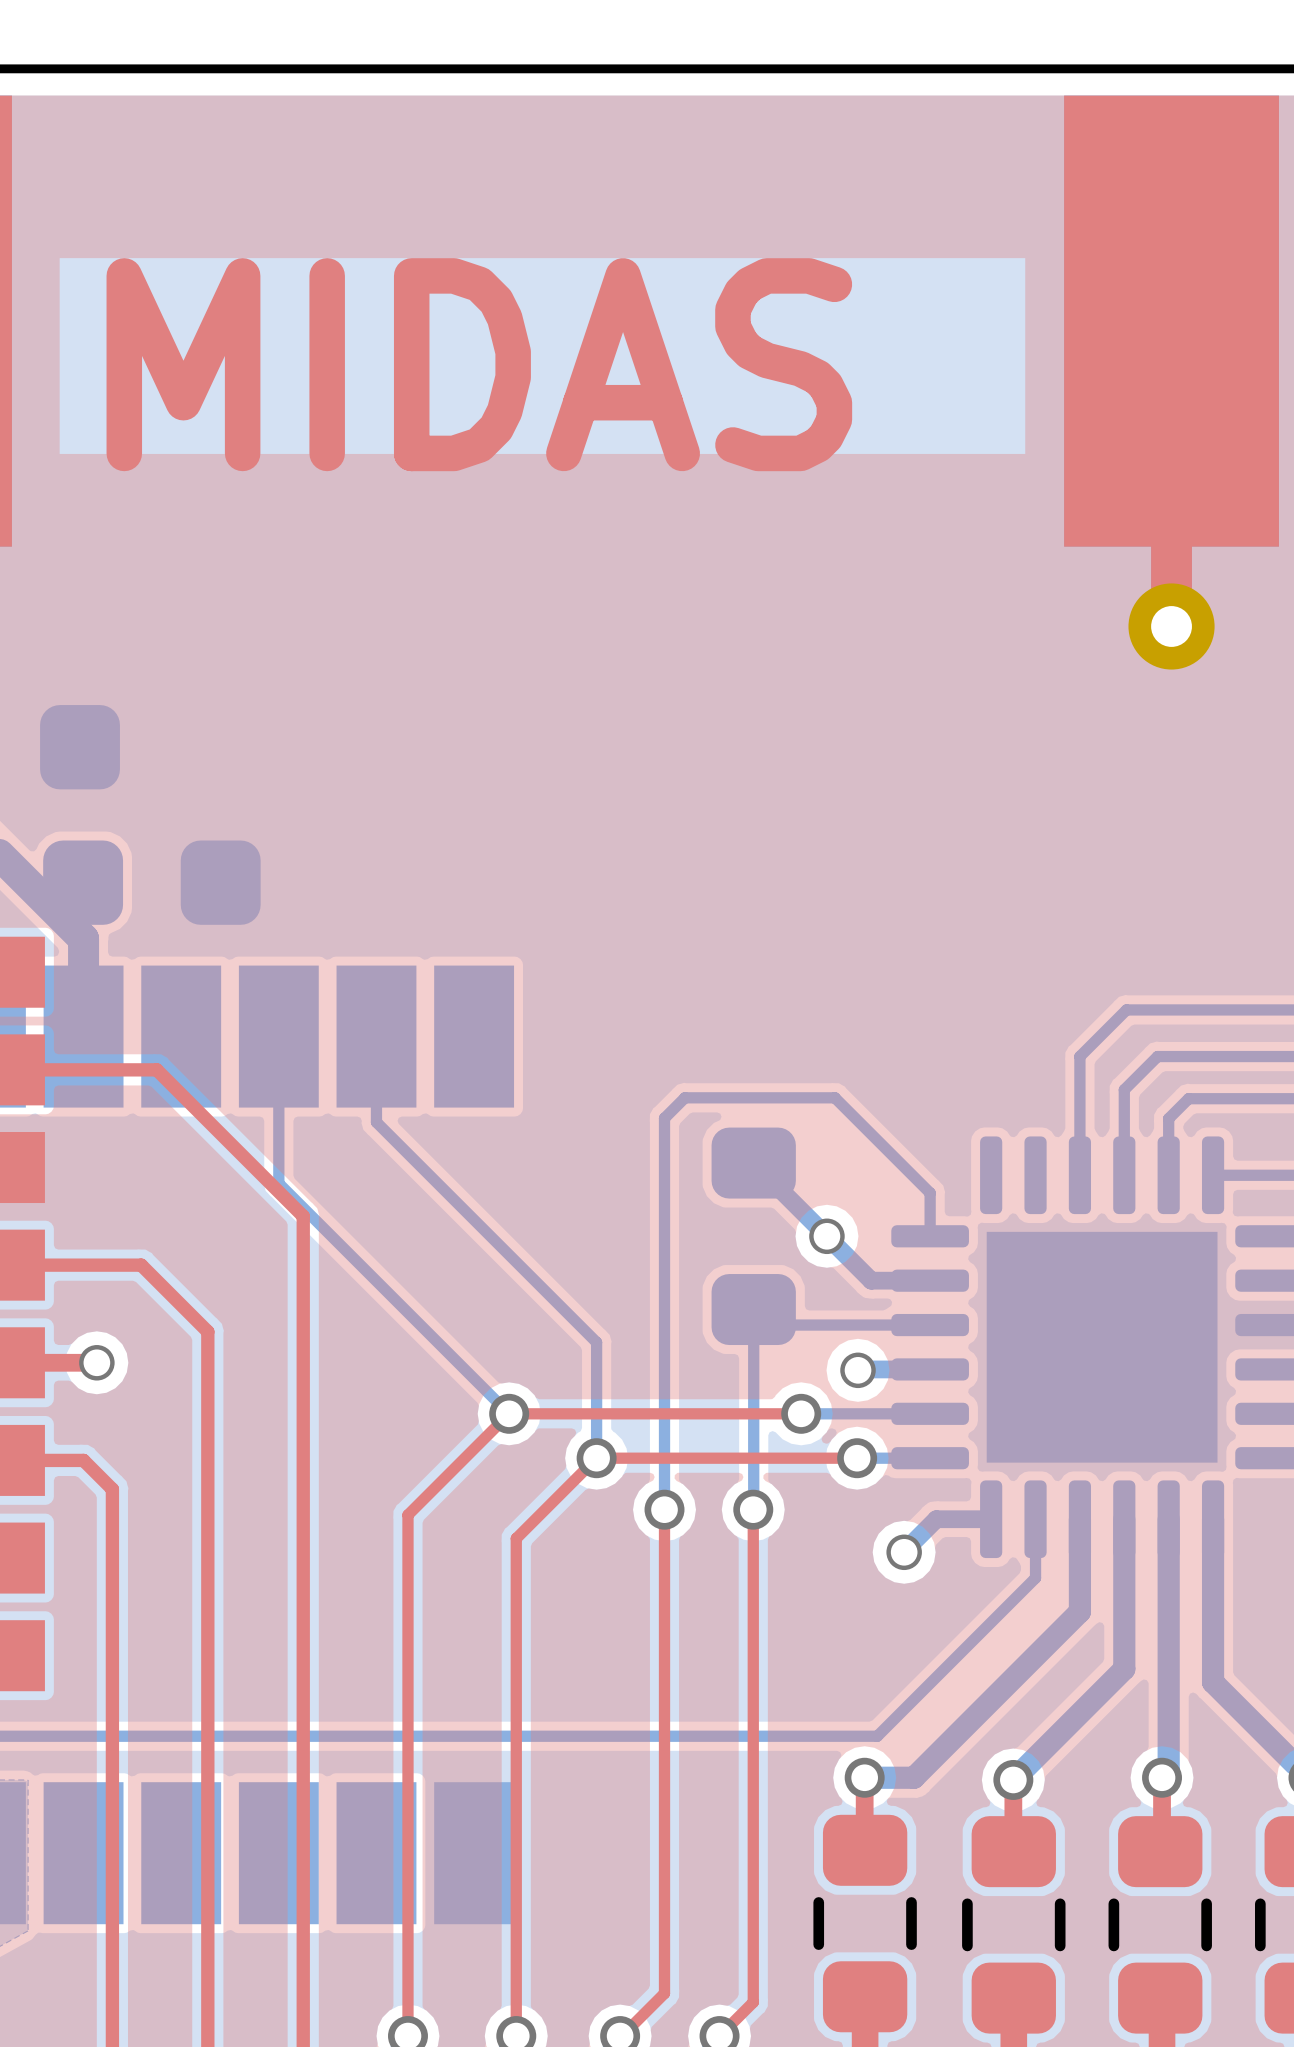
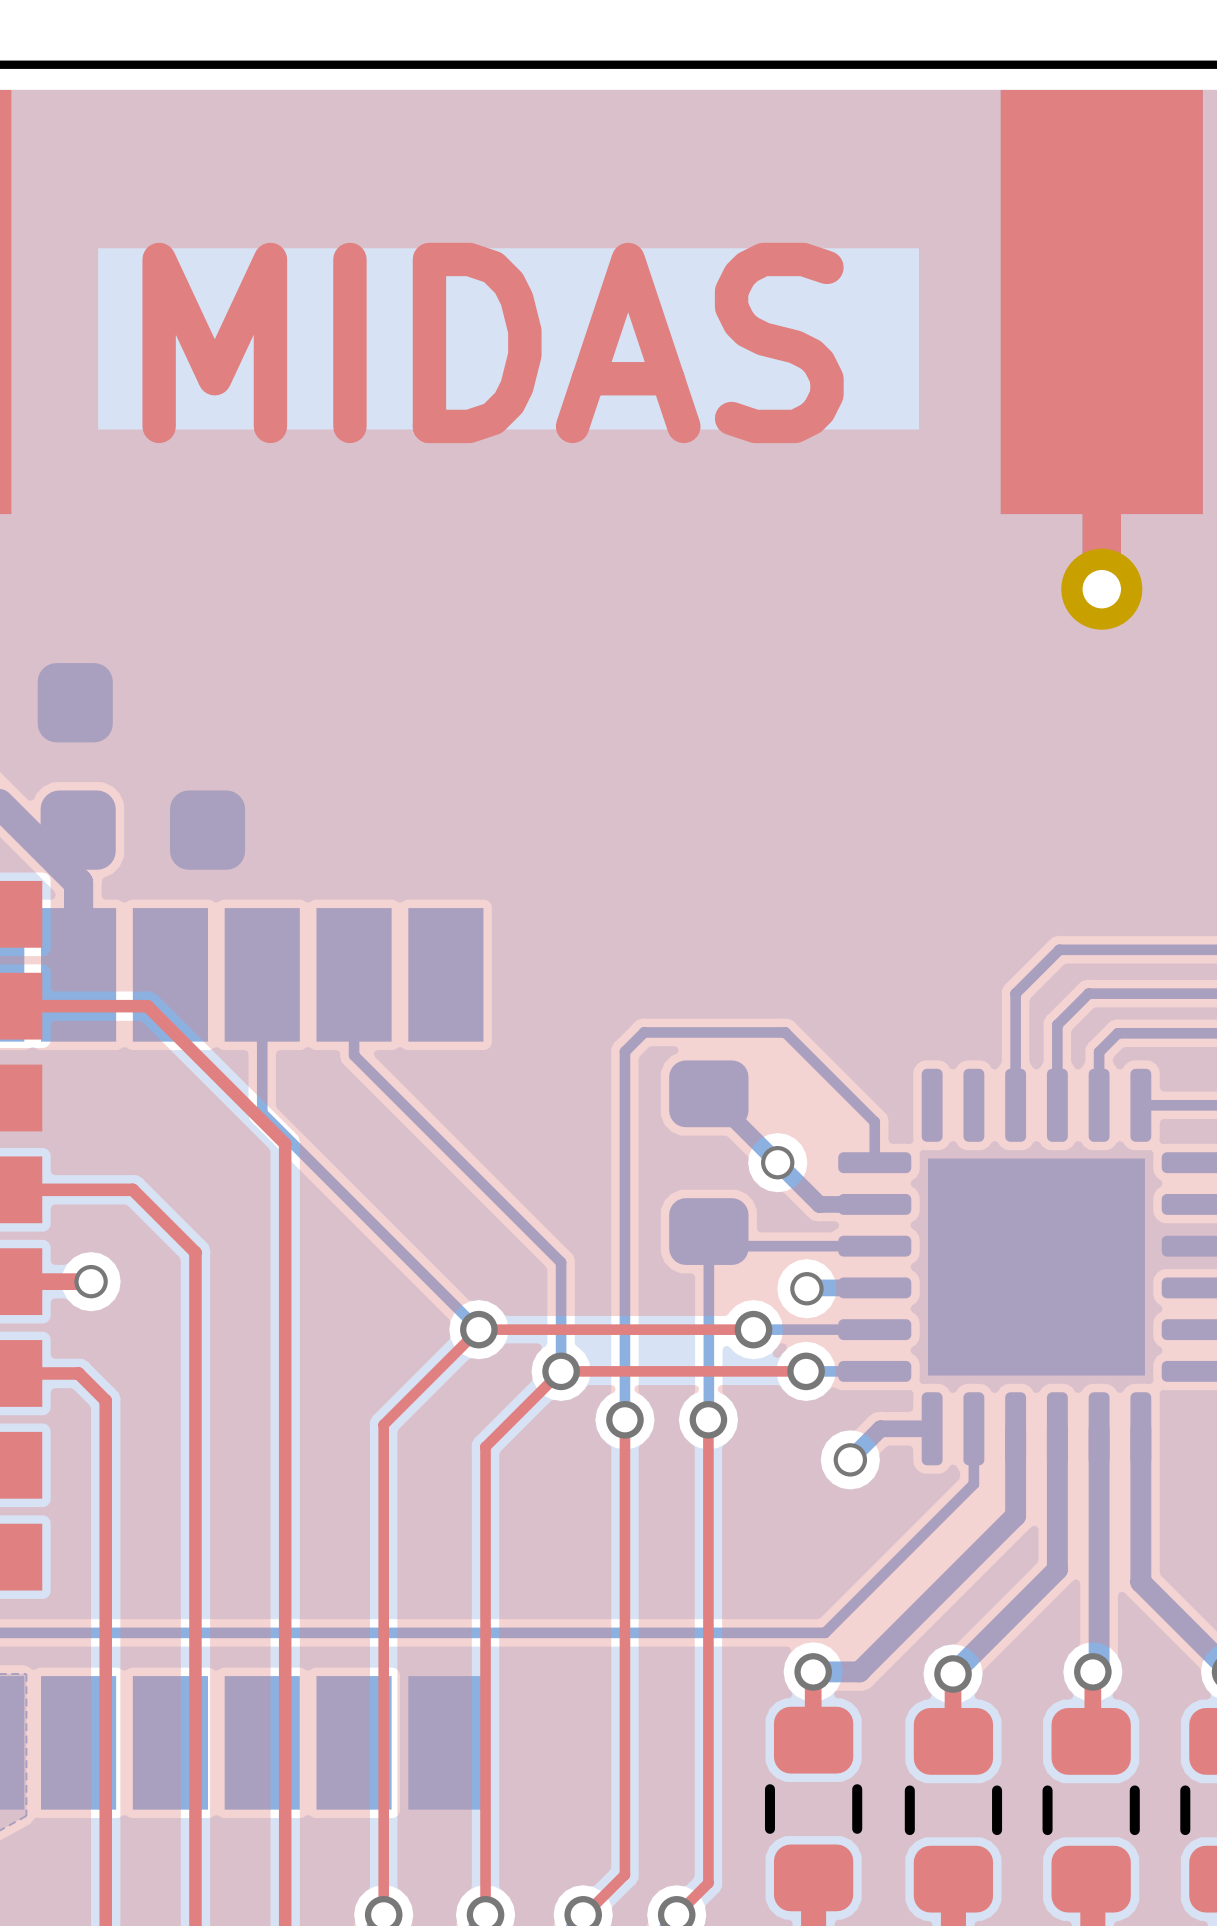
text position: MIDAS (479, 364) -> MIDAS (493, 342)

